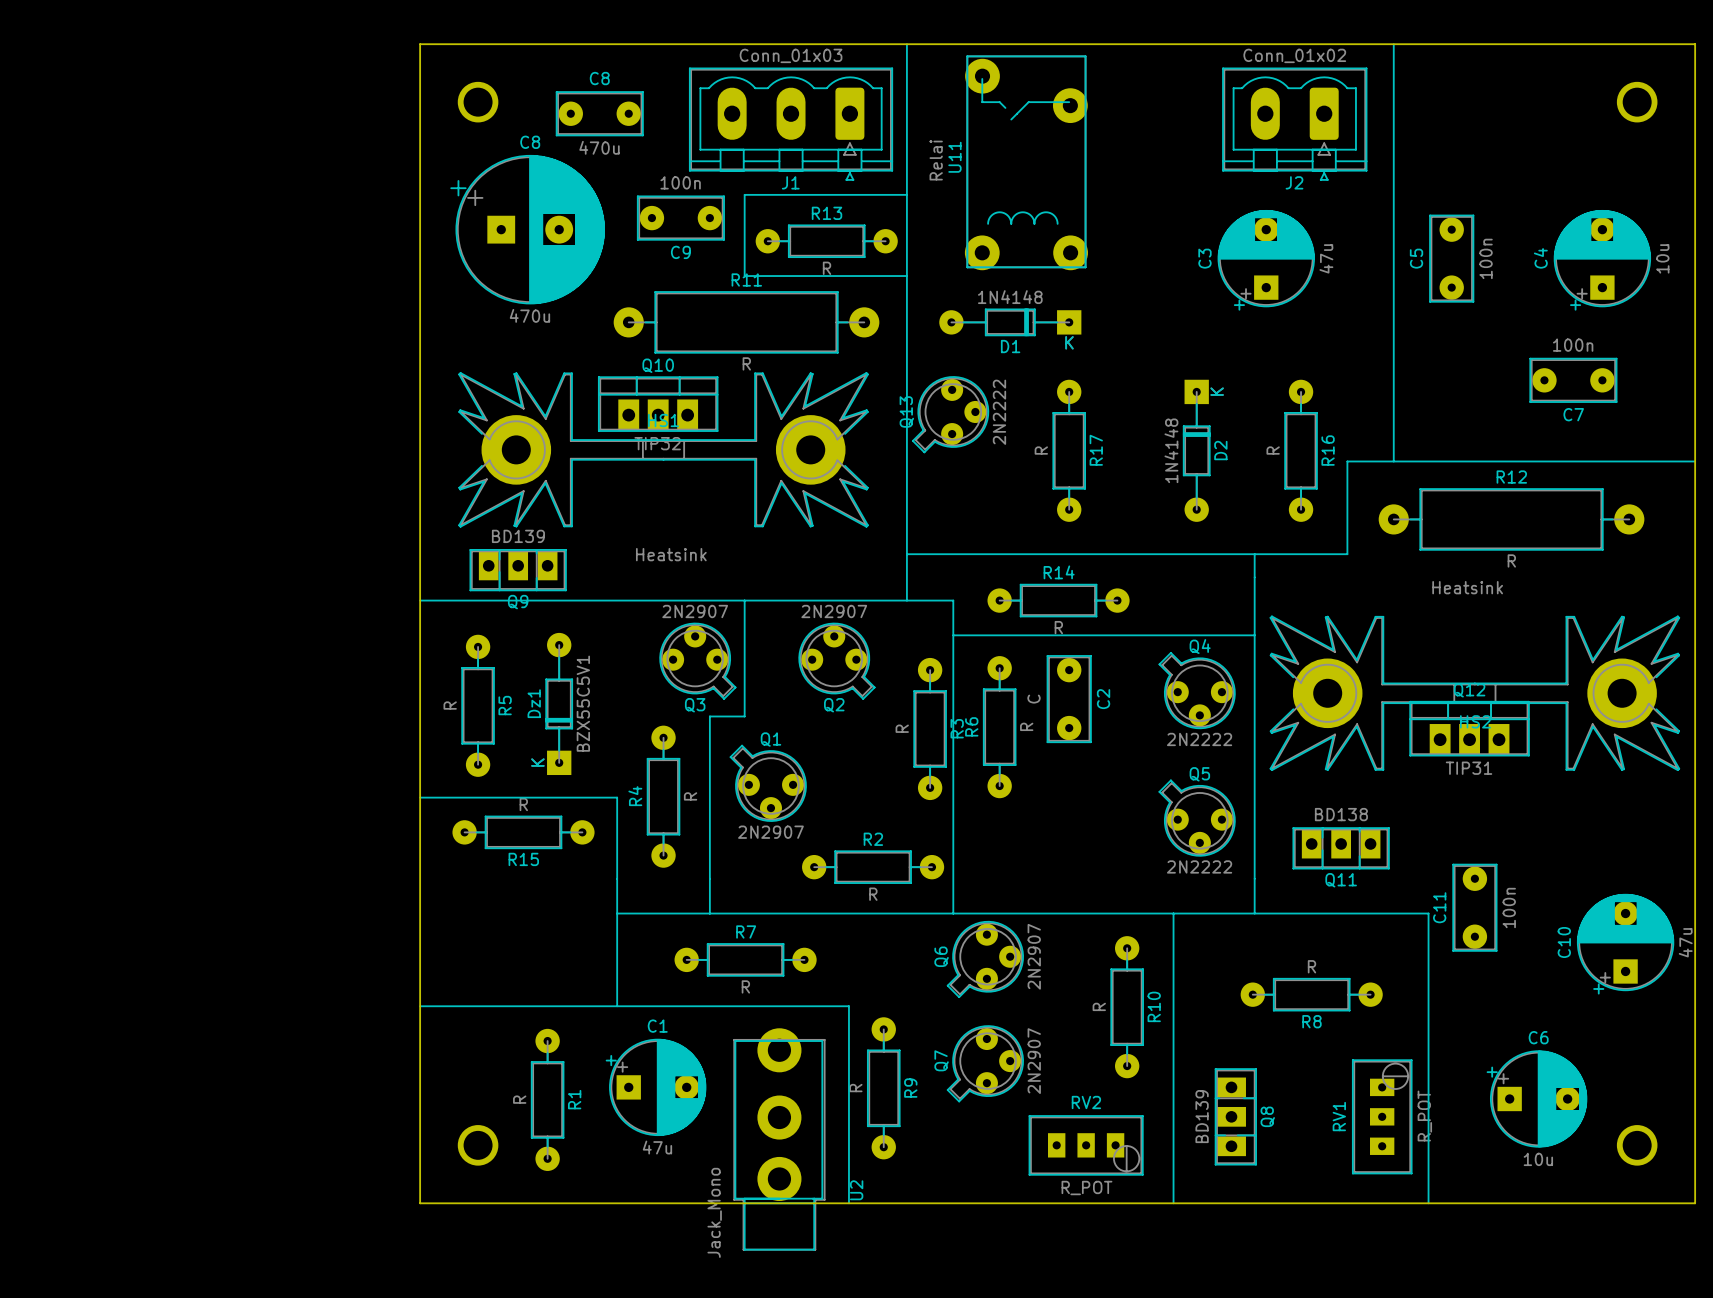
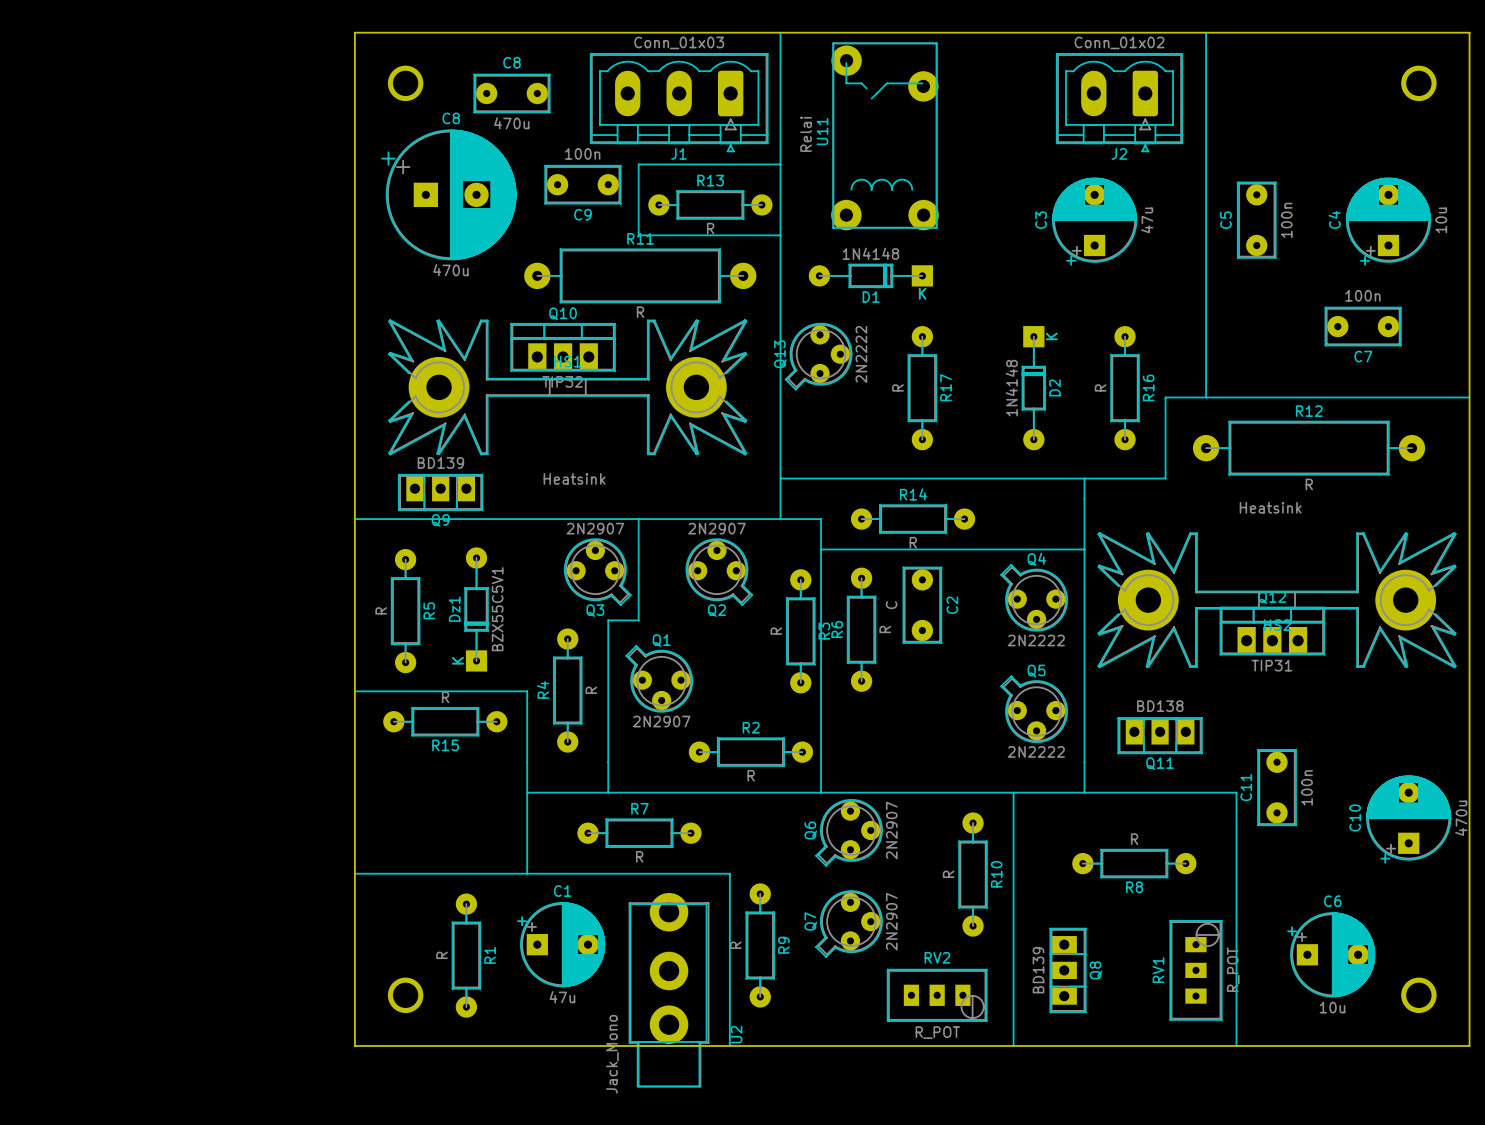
C10 value: 47u (1685, 942) -> 470u (1461, 818)

